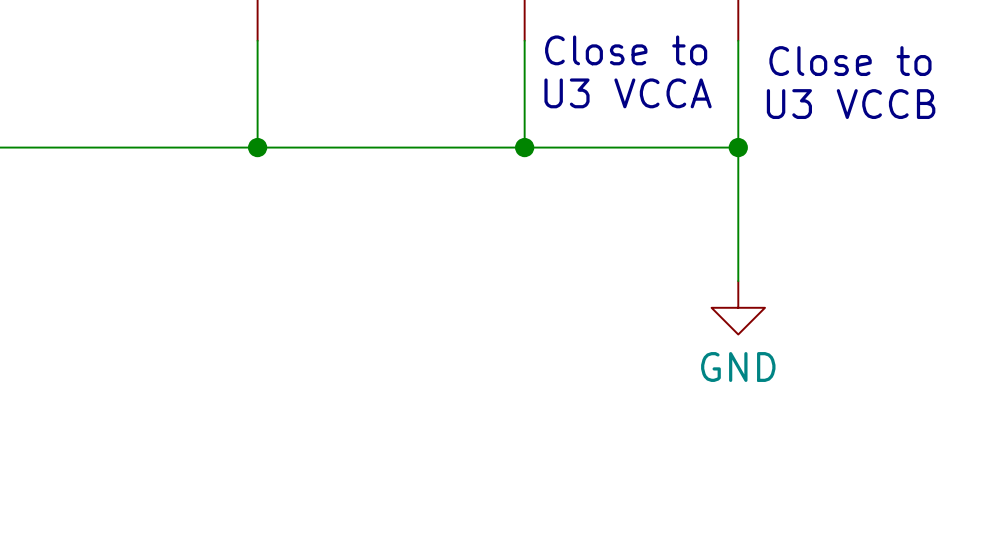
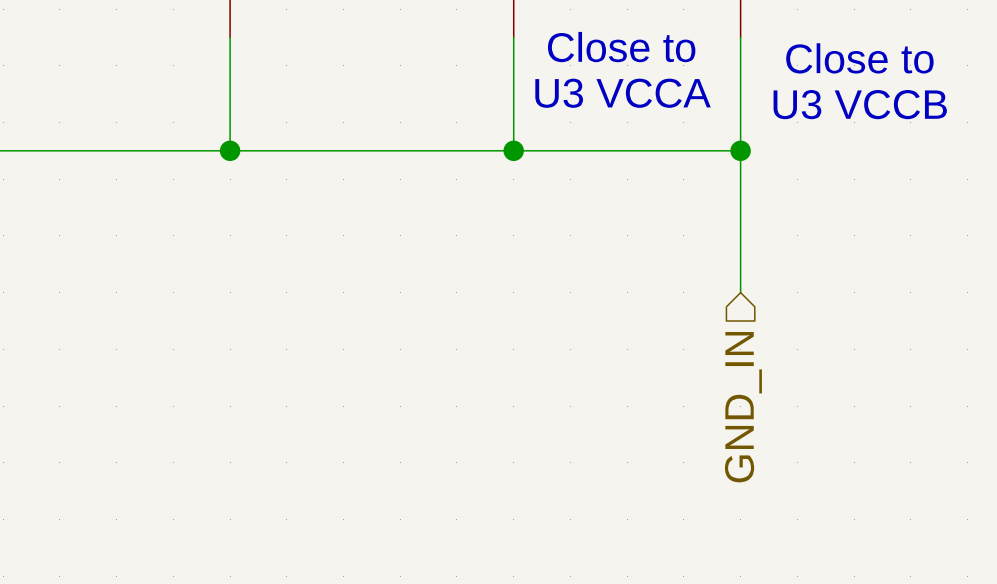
power symbol: GND (738, 307) -> none
hierarchical label: none -> GND_IN (743, 407)

